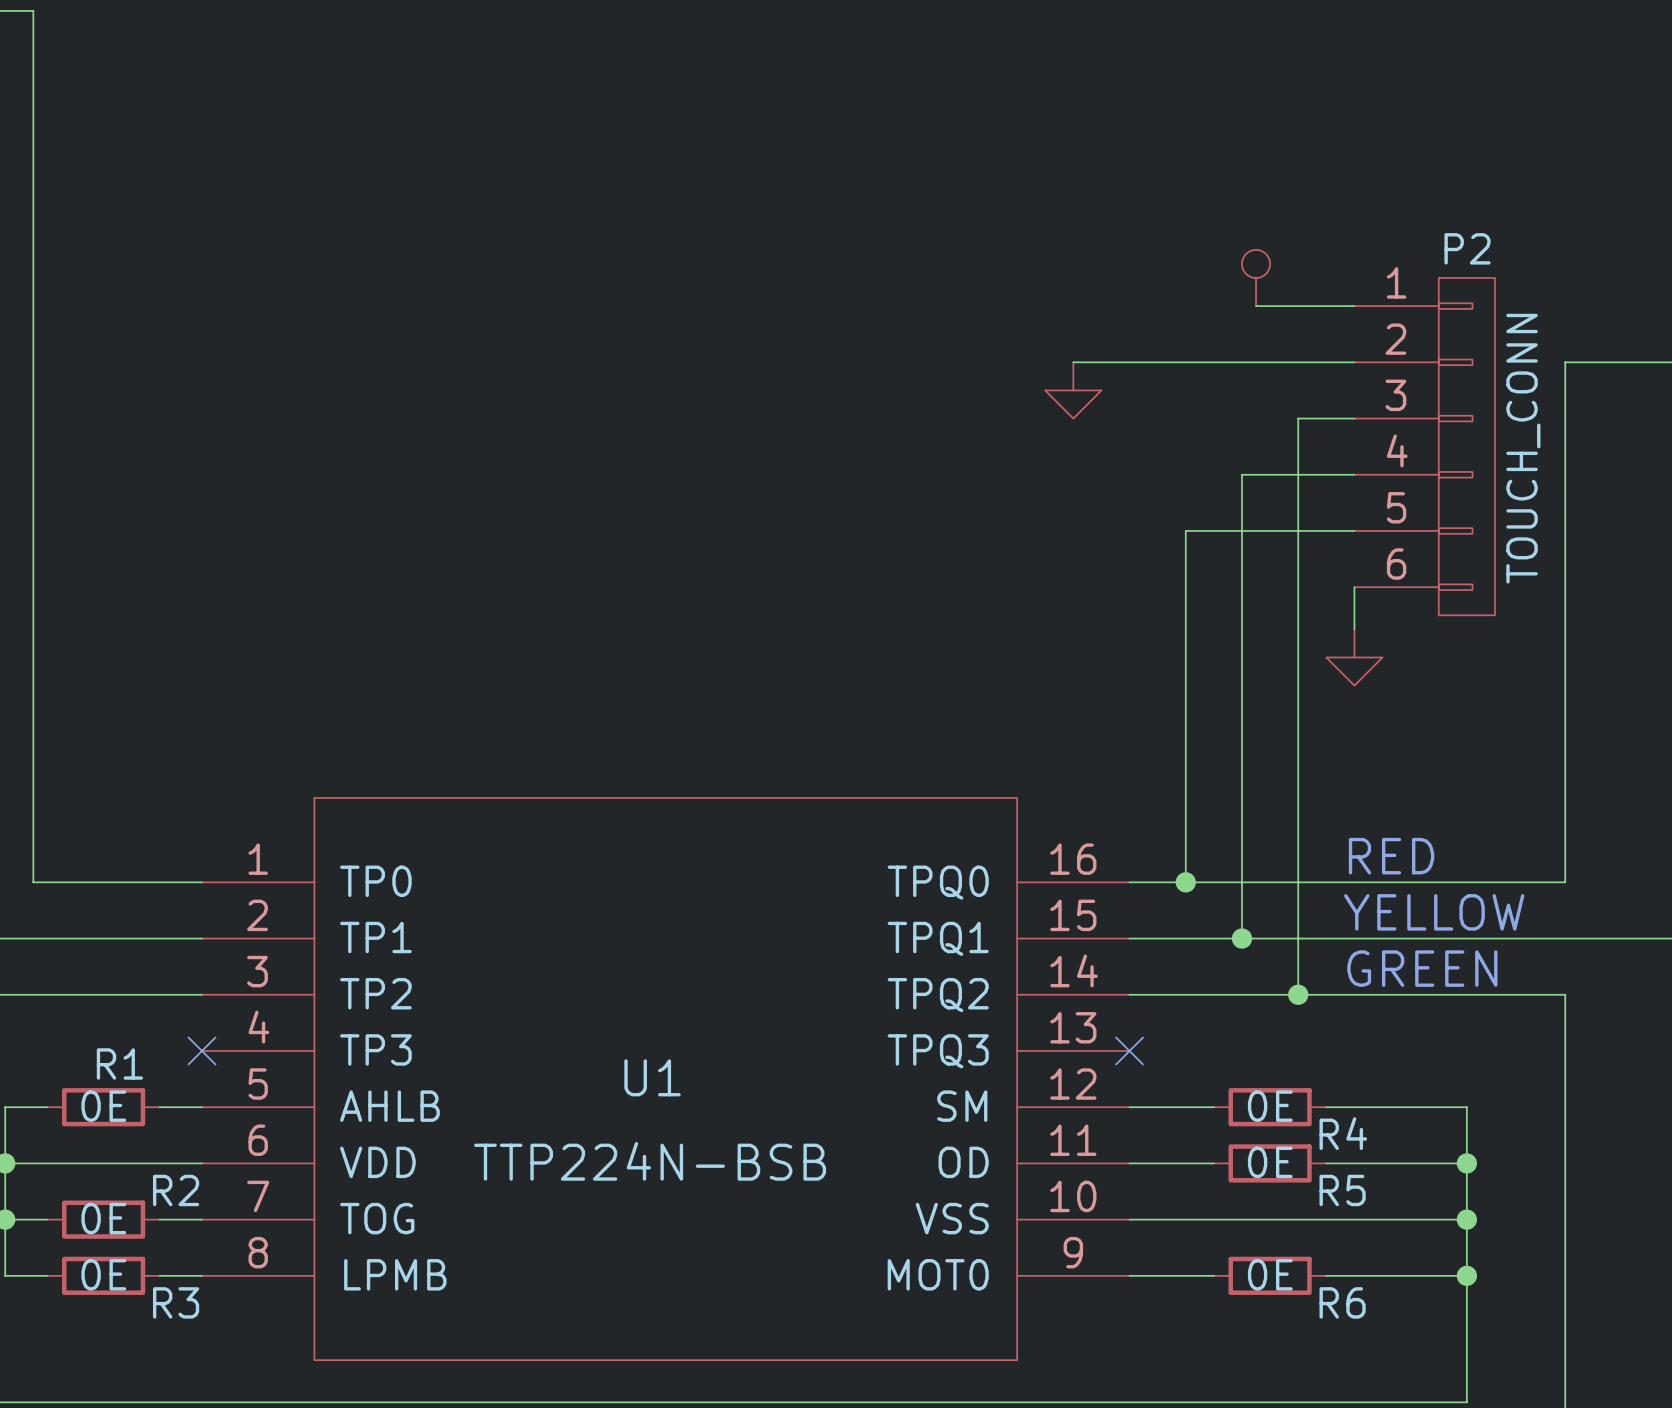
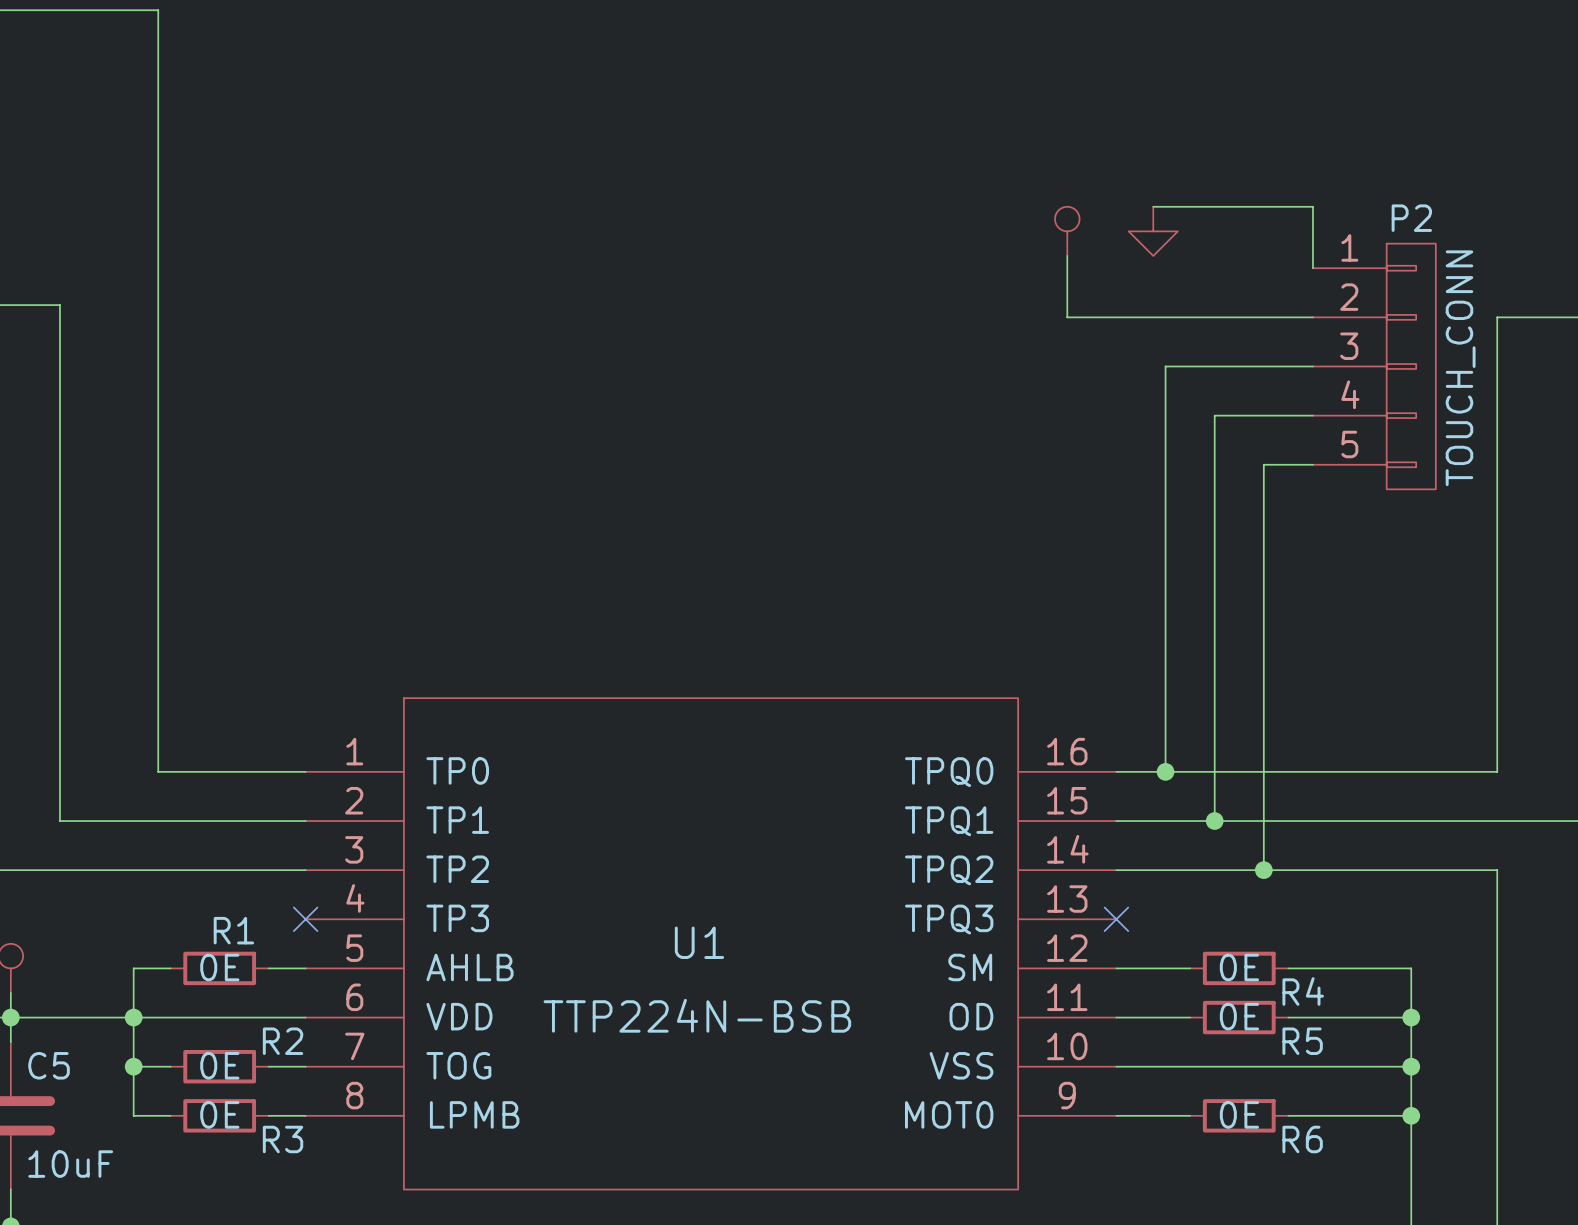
power symbol position: (1256, 278) -> (1067, 231)
P2 symbol: [1354, 278, 1495, 616] -> [1312, 243, 1436, 490]
wire: none -> (1067, 255) (1067, 317)
wire: (1256, 306) (1354, 306) -> (1153, 206) (1312, 206) (1312, 268)
power symbol position: (1073, 390) -> (1153, 231)
wire: (1298, 418) (1298, 530) (1185, 530) -> (1263, 366) (1165, 366) (1165, 464)
wire: (1354, 587) (1354, 629) -> none
power symbol: (1354, 657) -> none
text: RED (1391, 856) -> none
text: YELLOW (1434, 912) -> none
text: GREEN (1422, 968) -> none

